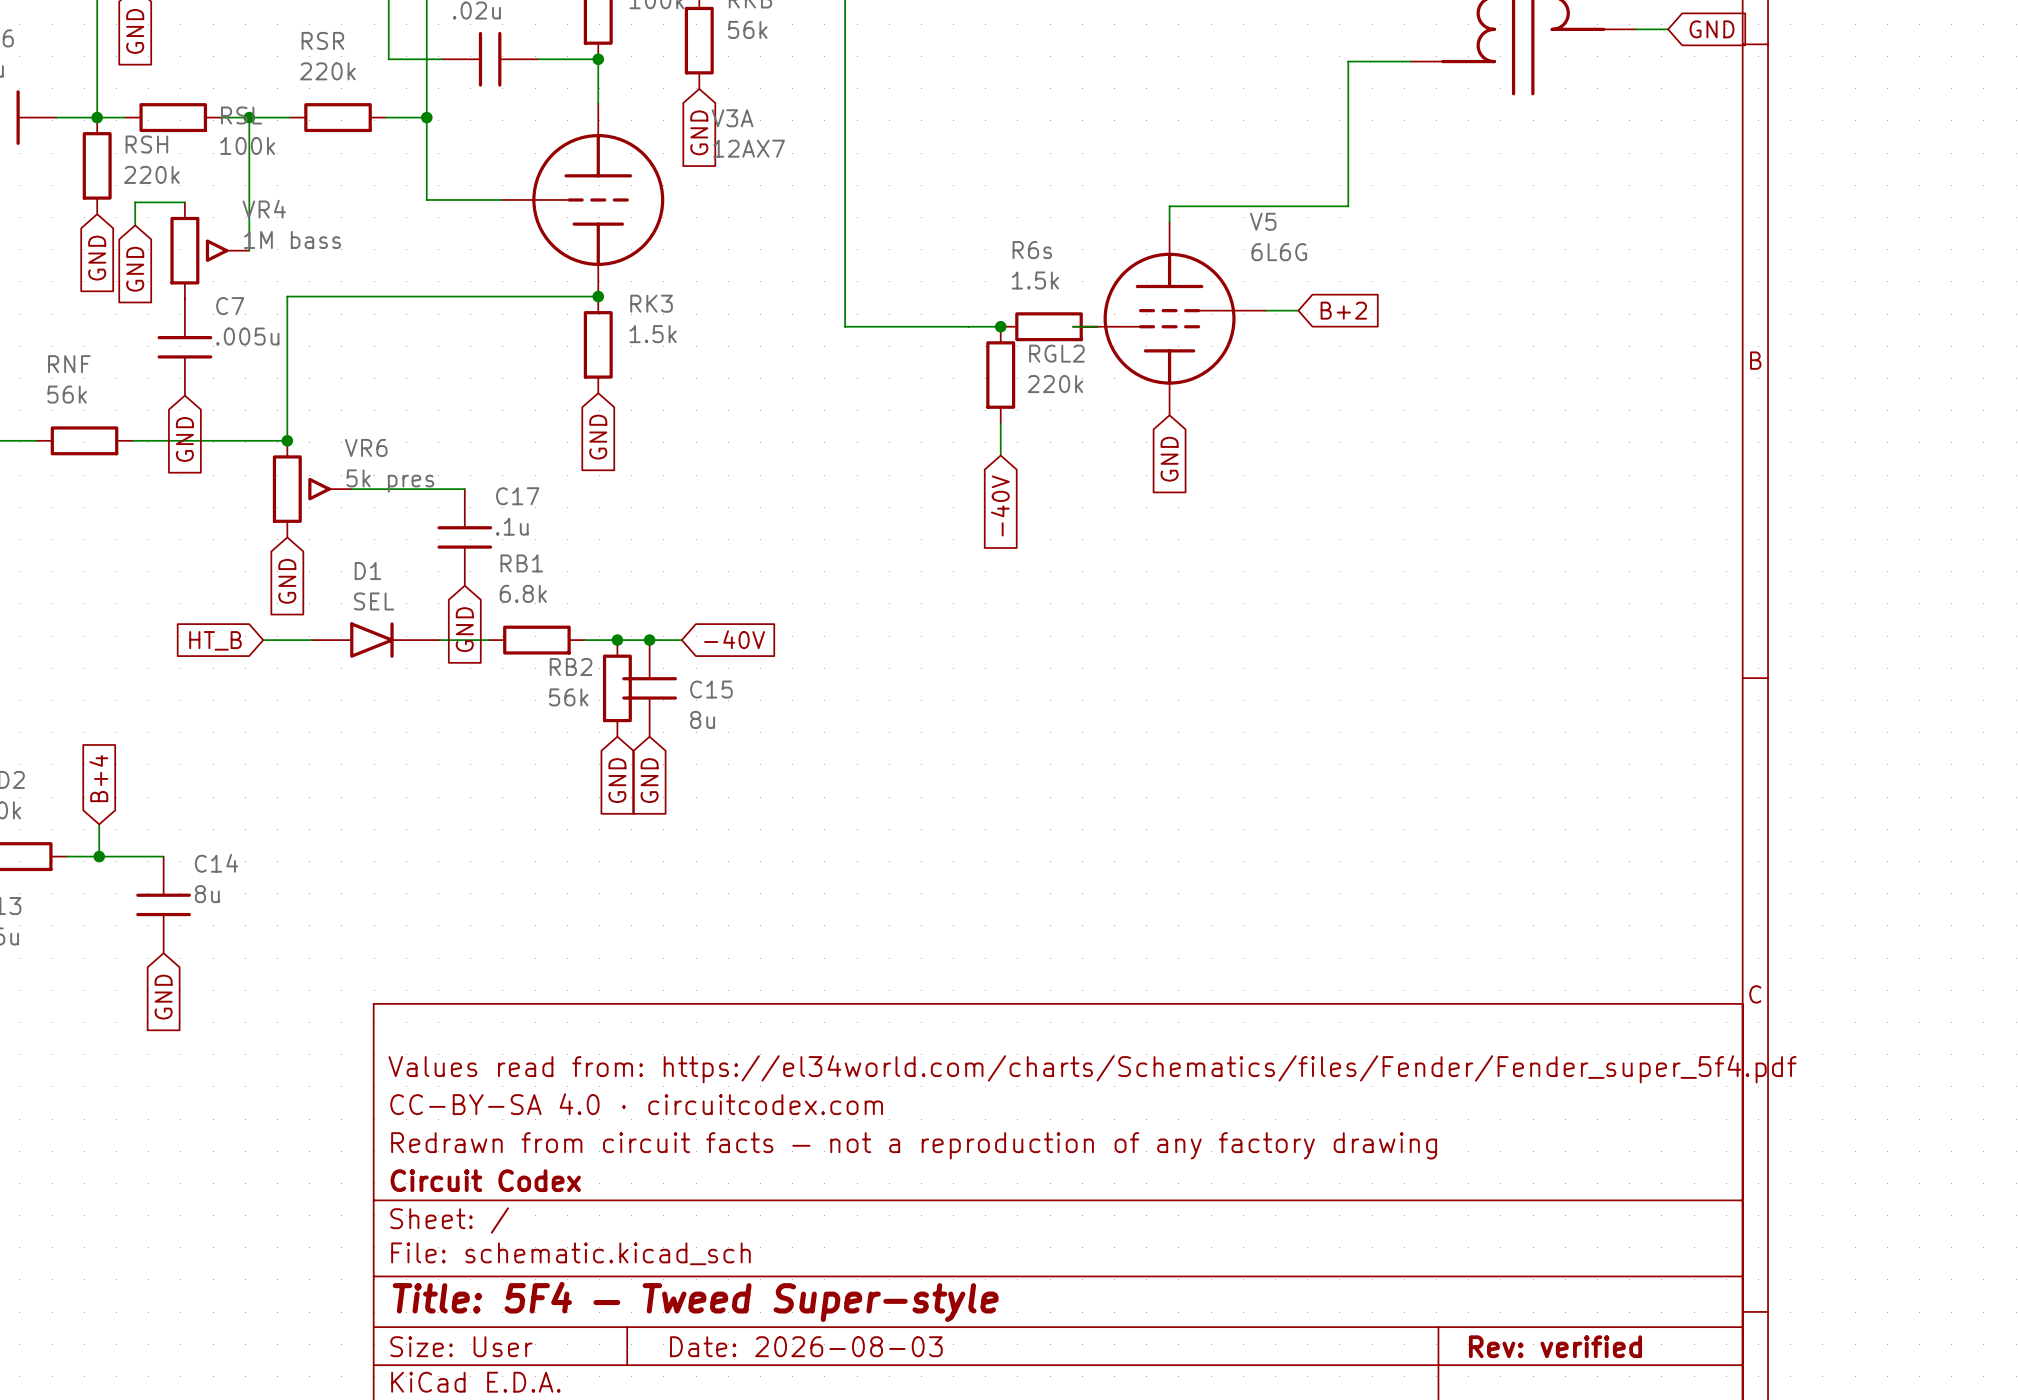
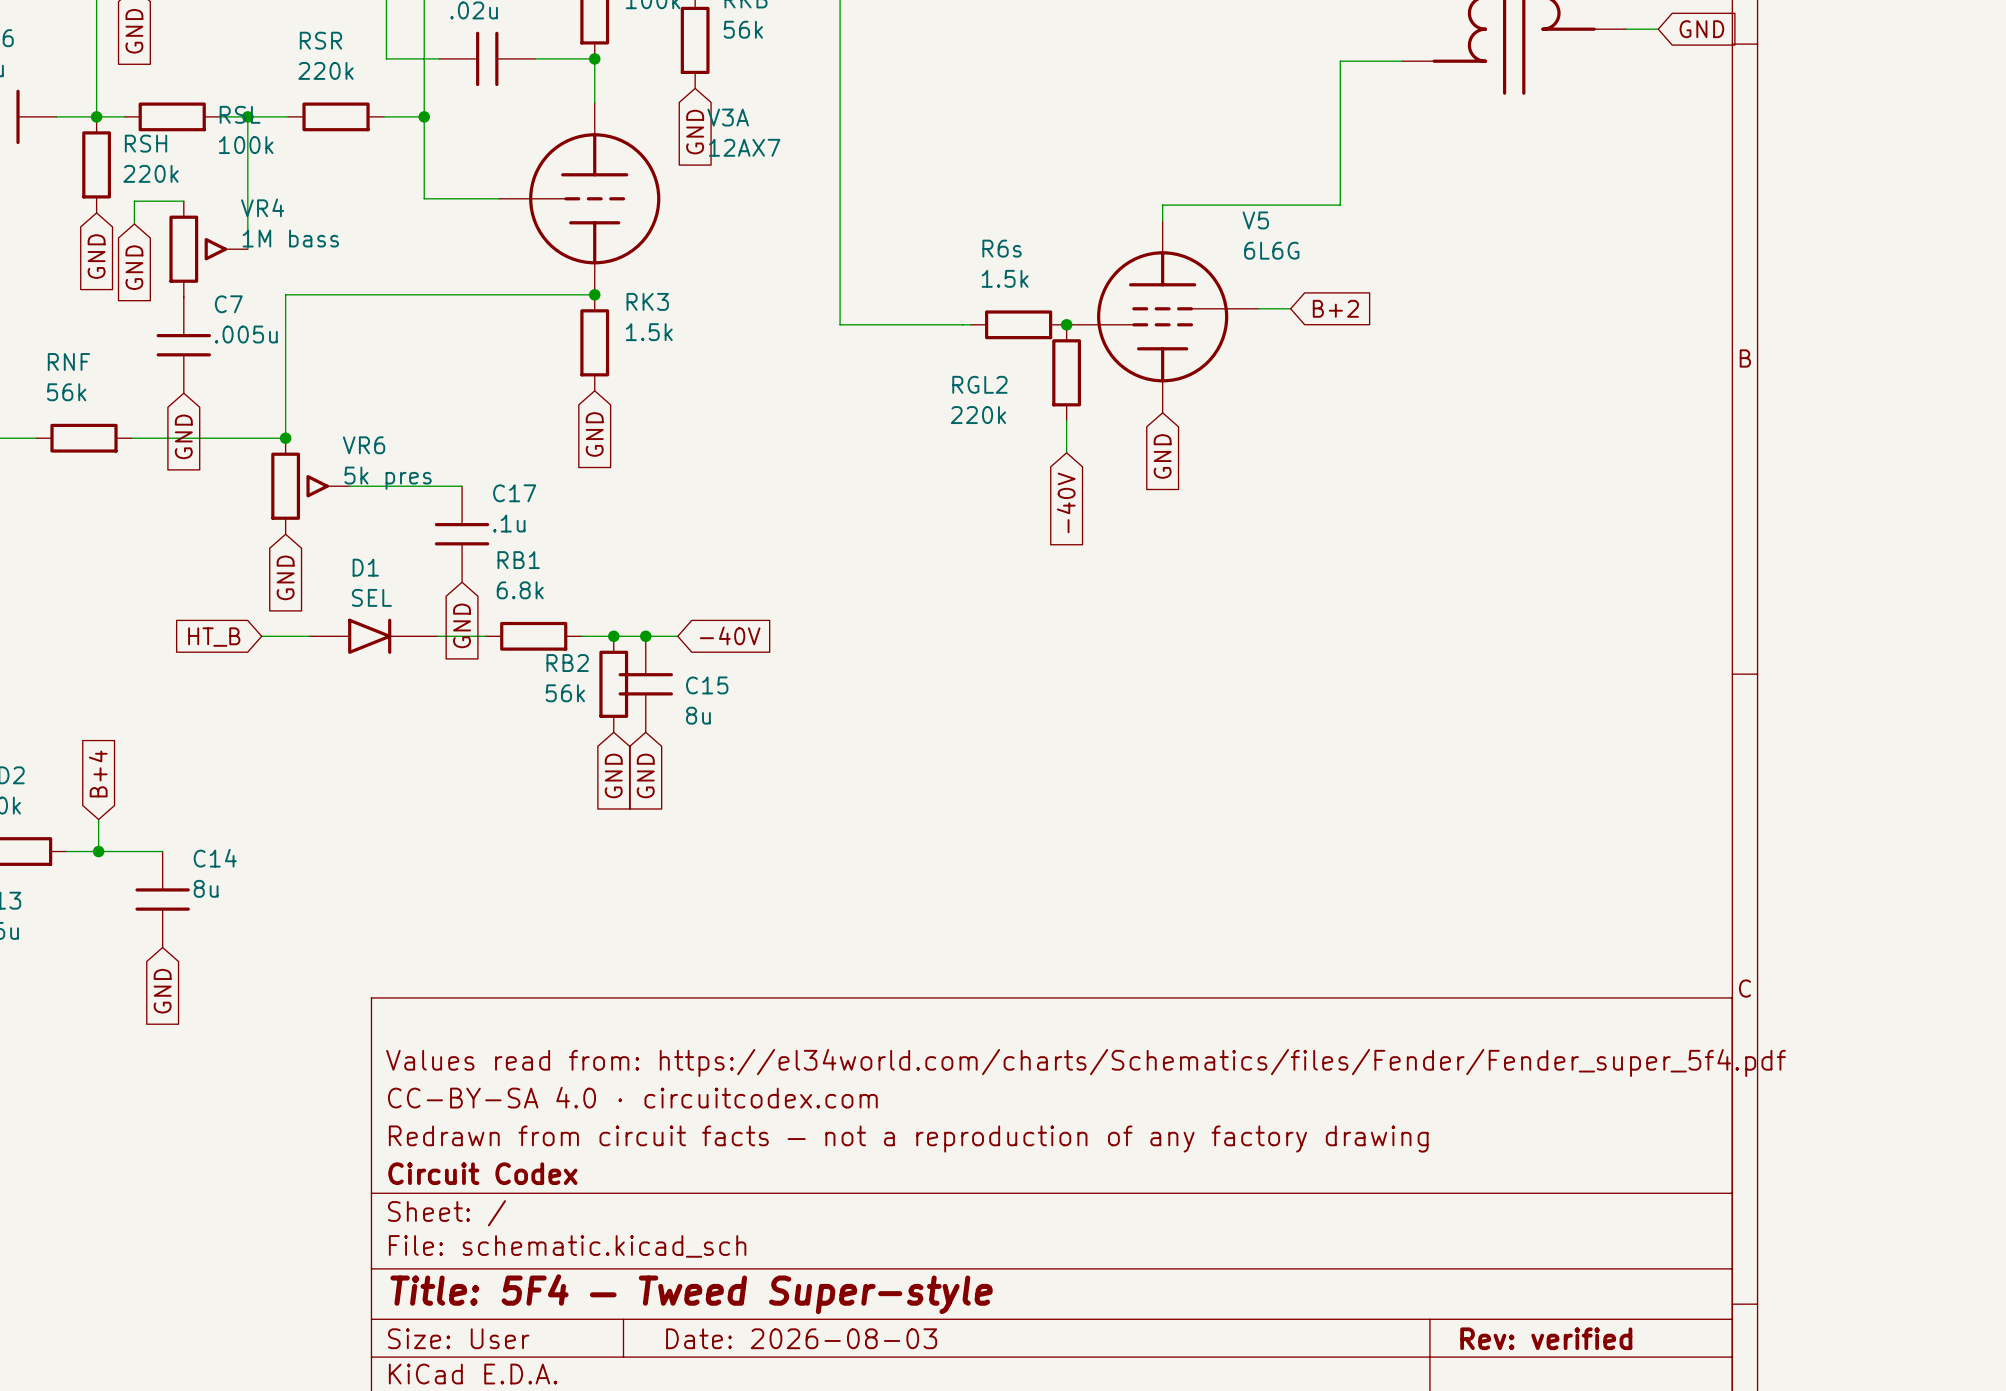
junction position: (1000, 326) -> (1066, 324)
R6s position: (1049, 326) -> (1018, 324)
RGL2 name position: RGL2 (1056, 353) -> RGL2 (979, 384)
RGL2 position: (1000, 375) -> (1066, 372)
RGL2 value position: 220k (1055, 384) -> 220k (978, 415)
wire: (1000, 423) (1000, 455) -> (1066, 420) (1066, 452)
global label position: -40V (1000, 505) -> -40V (1066, 502)

